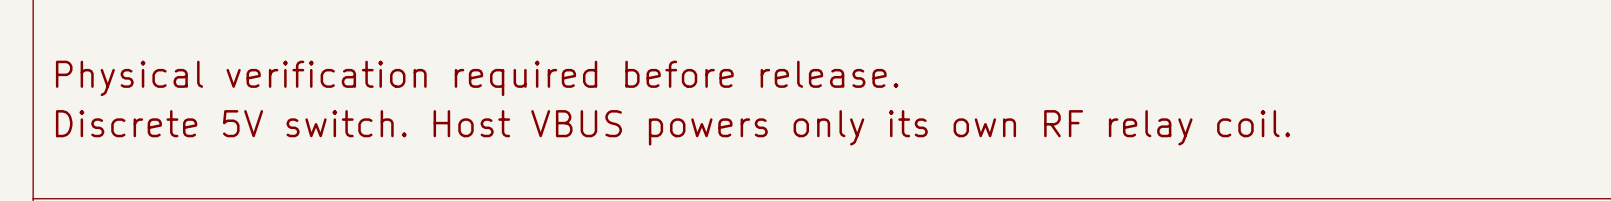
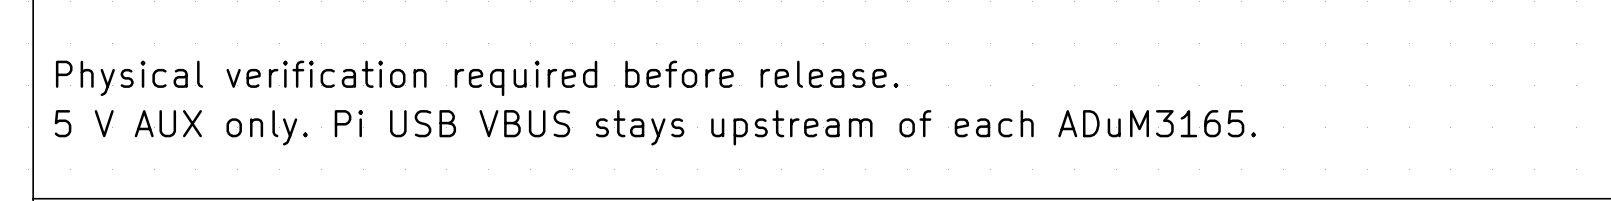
title block: Discrete 5V switch. Host VBUS powers only its own RF relay coil. (673, 127) -> 5 V AUX only. Pi USB VBUS stays upstream of each ADuM3165. (655, 127)

